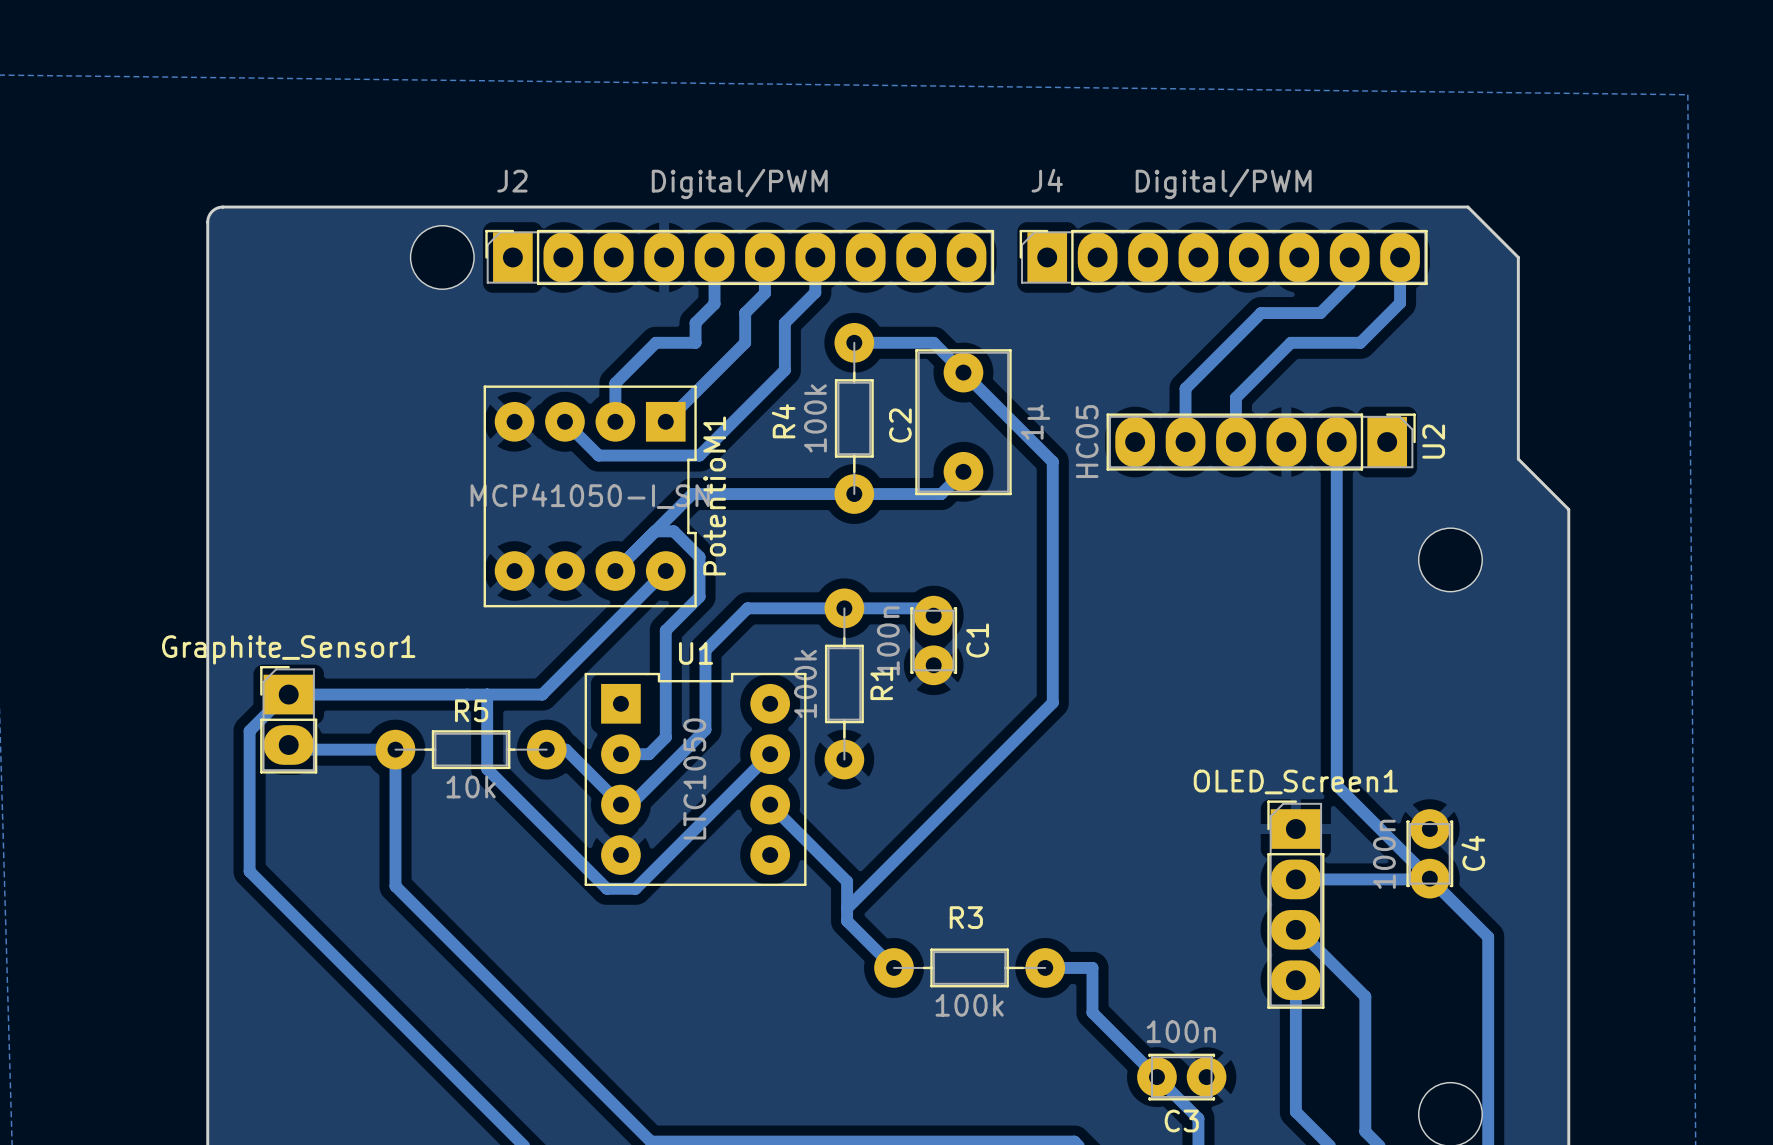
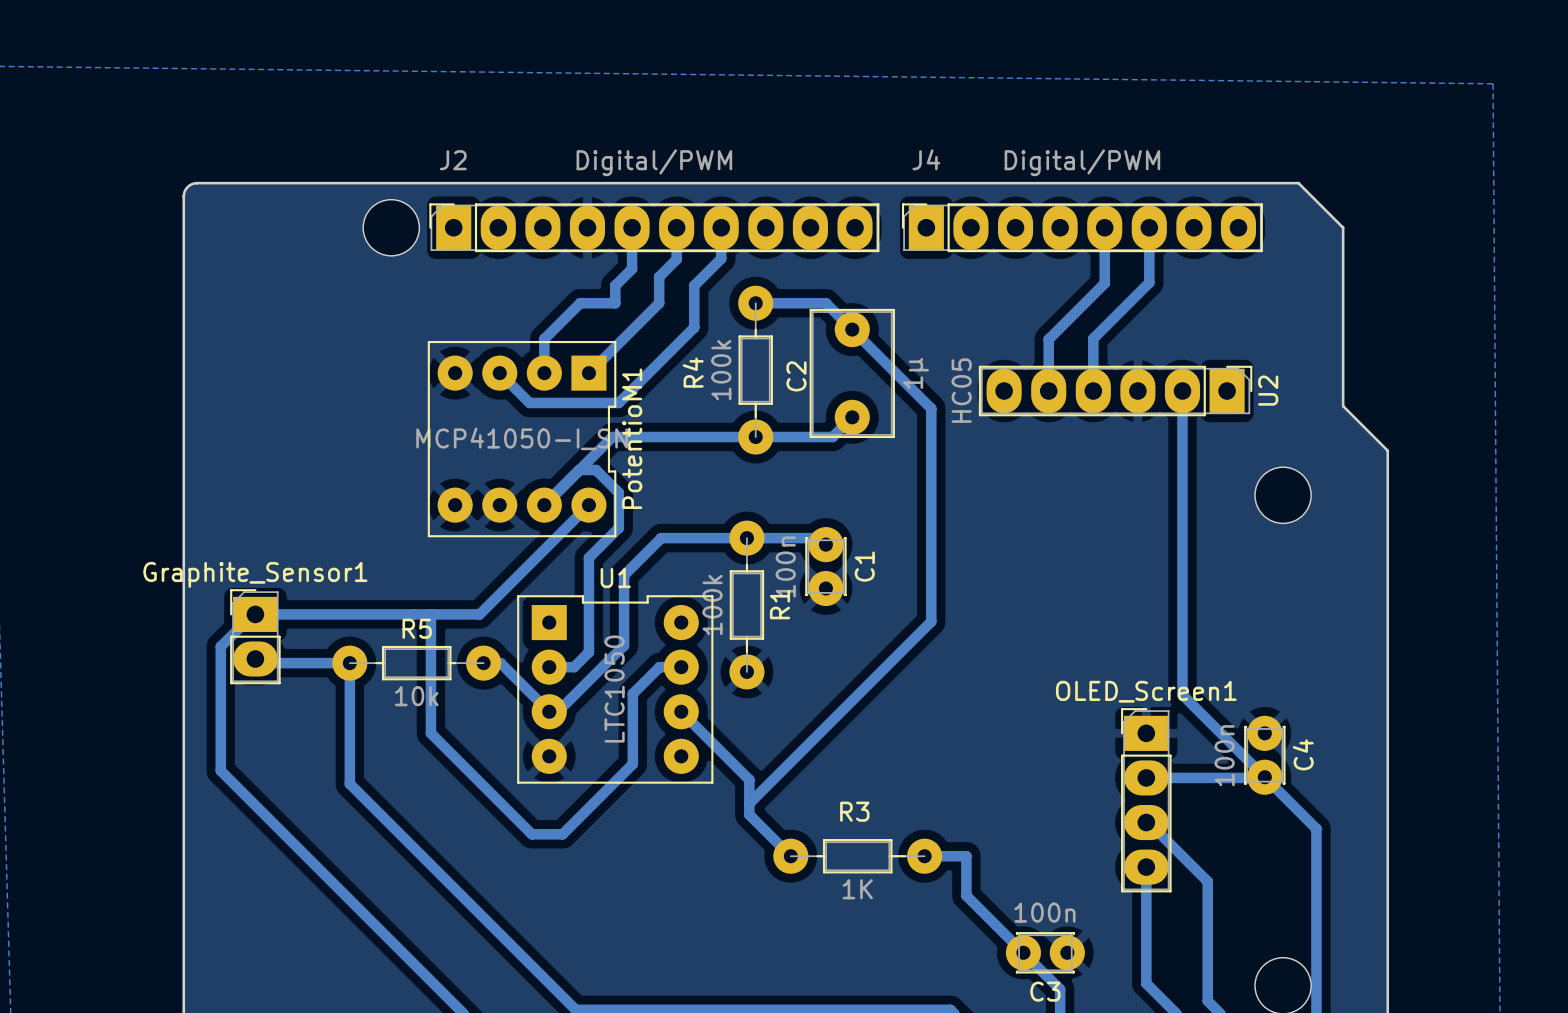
bottom track: (1349, 257) (1349, 283) (1320, 313) (1261, 313) (1185, 388) -> (1104, 227) (1104, 283) (1048, 339) (1048, 343)
bottom track: (1400, 257) (1400, 303) (1360, 342) (1290, 342) (1235, 397) -> (1149, 227) (1149, 282) (1093, 338) (1093, 351)
bottom track: (770, 754) (635, 888) (606, 888) (487, 769) -> (681, 667) (659, 667) (632, 693) (632, 764) (562, 834) (531, 834) (430, 733) (430, 680)
R3 value: 100k (969, 1005) -> 1K (857, 889)

